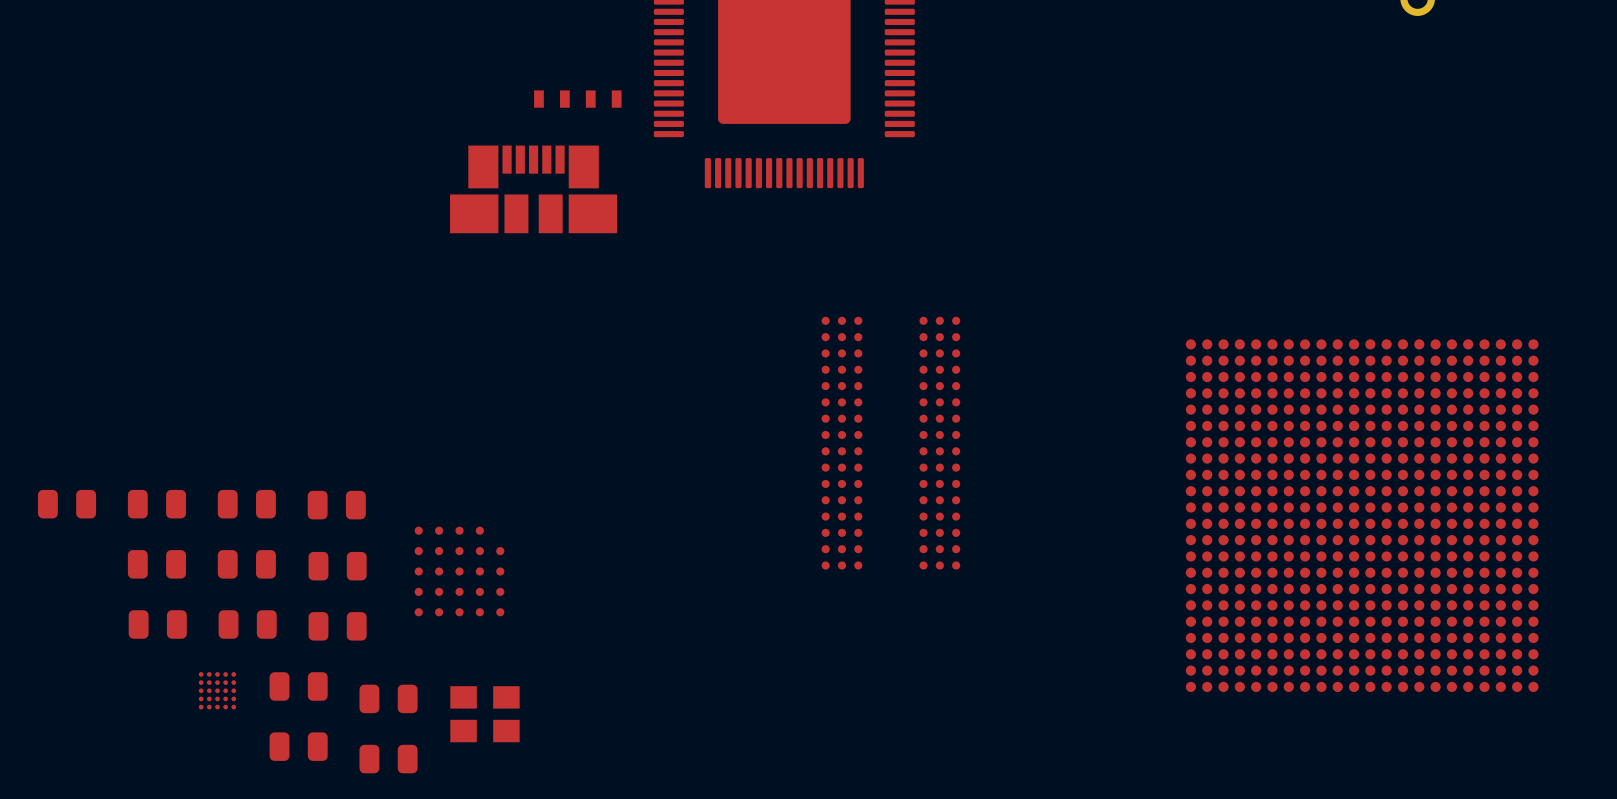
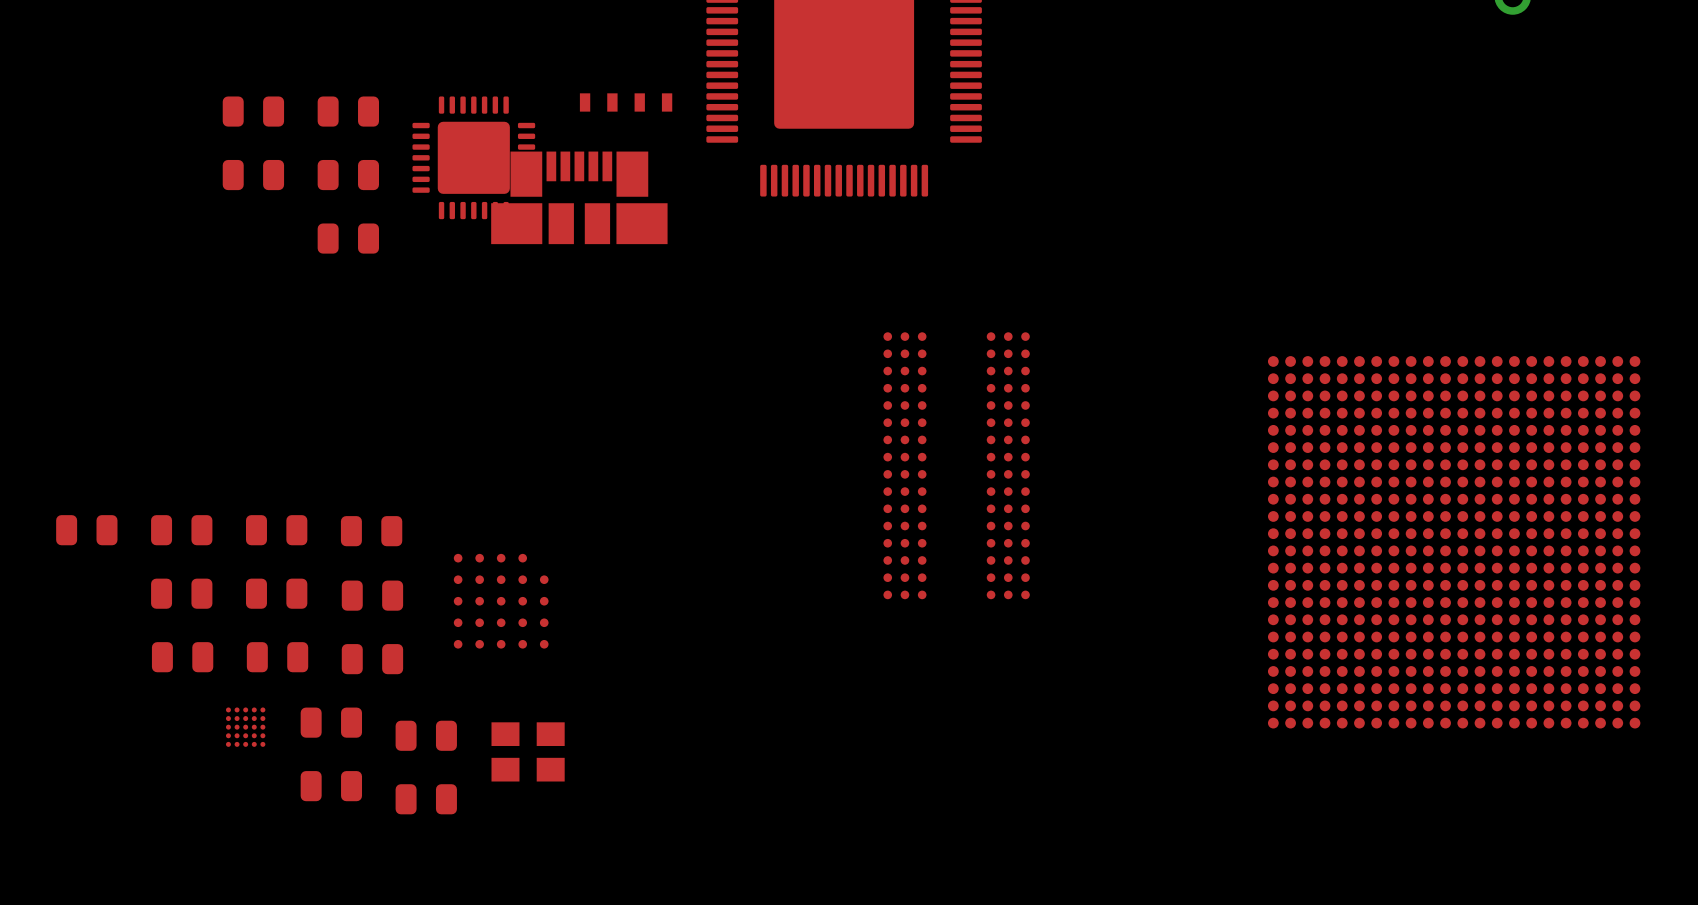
part: none -> (253, 111)
part: none -> (348, 111)
part: none -> (473, 157)
part: none -> (253, 175)
part: none -> (348, 175)
part: none -> (348, 238)

